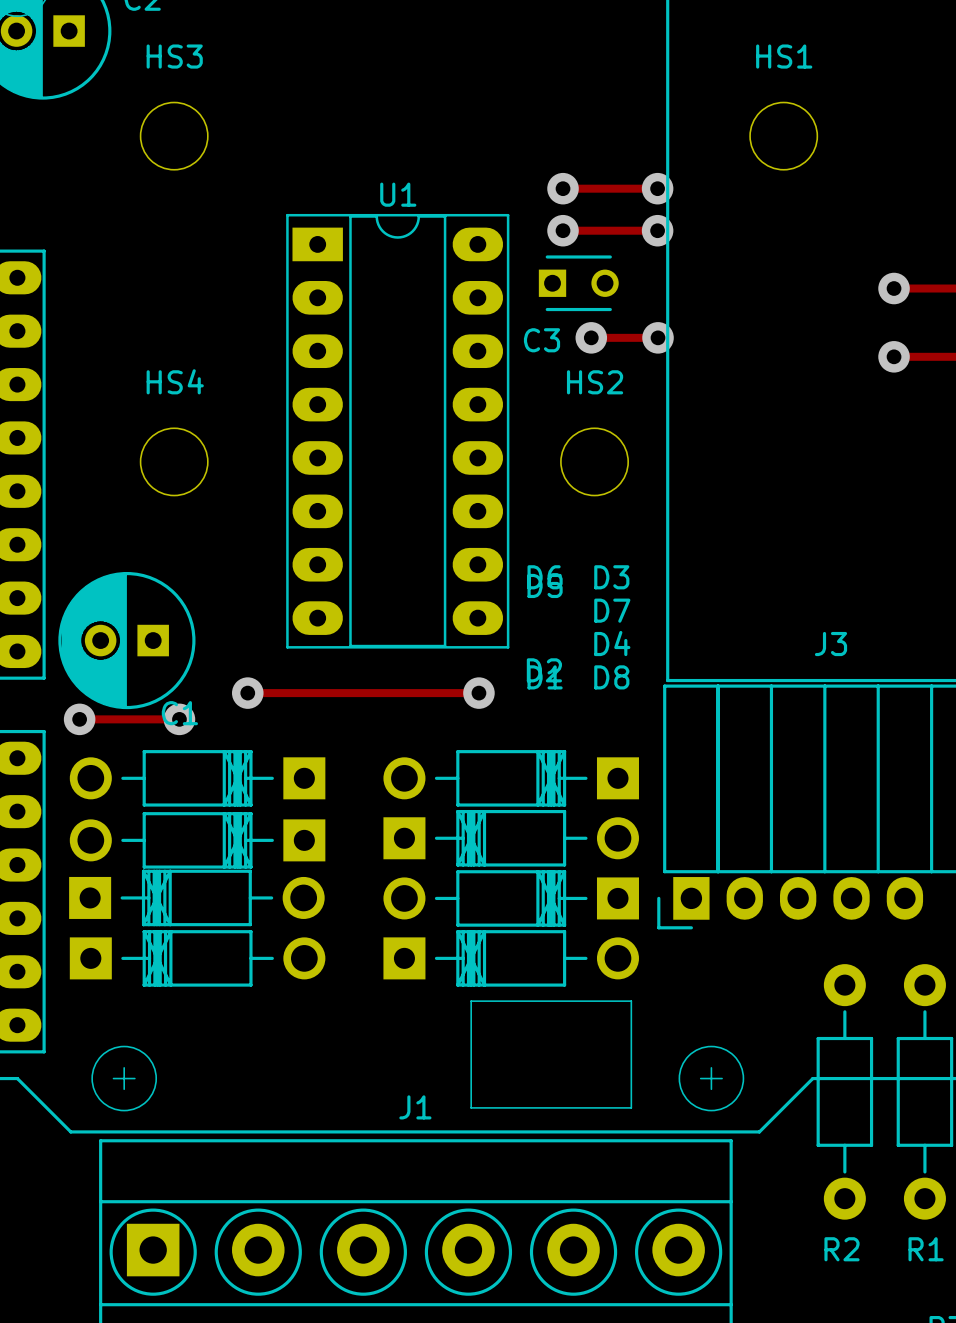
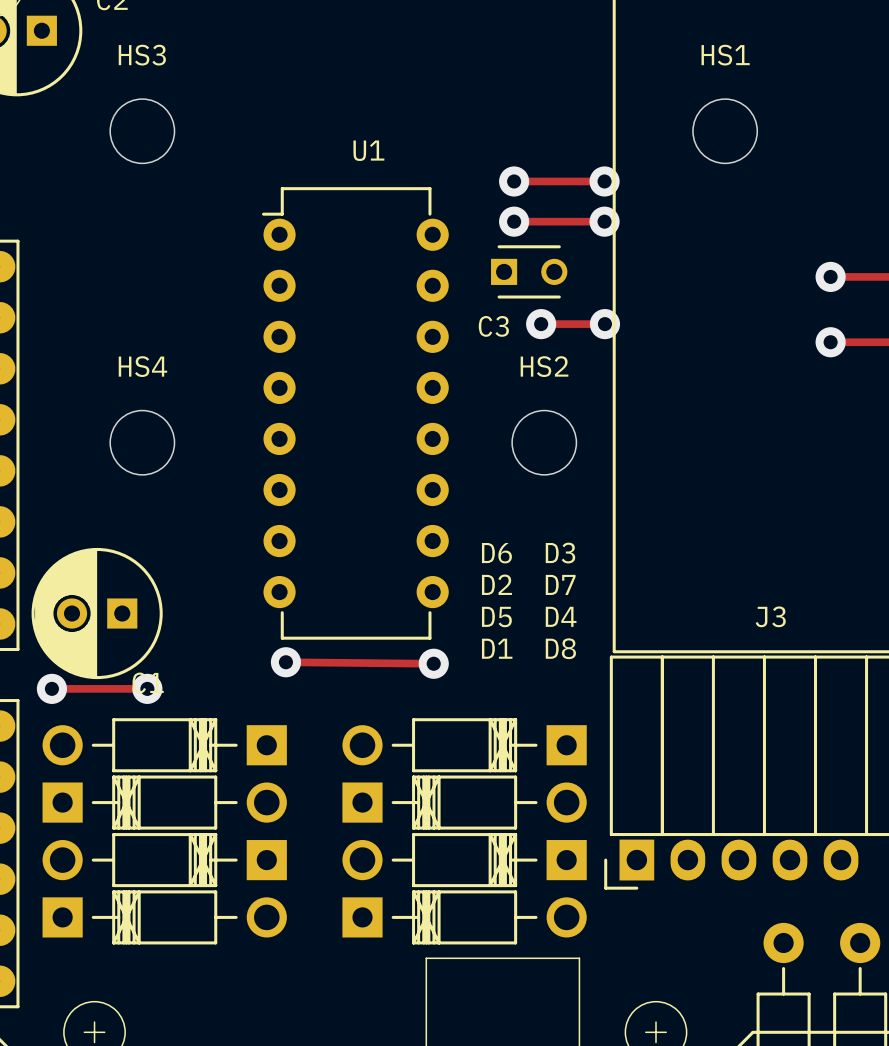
U1 footprint: [286, 213, 510, 649] -> [261, 187, 449, 640]
track: (247, 693) (478, 693) -> (285, 662) (433, 663)
via position: (247, 693) -> (285, 662)
D5 position: (197, 840) -> (164, 860)
D2 position: (196, 897) -> (164, 802)

